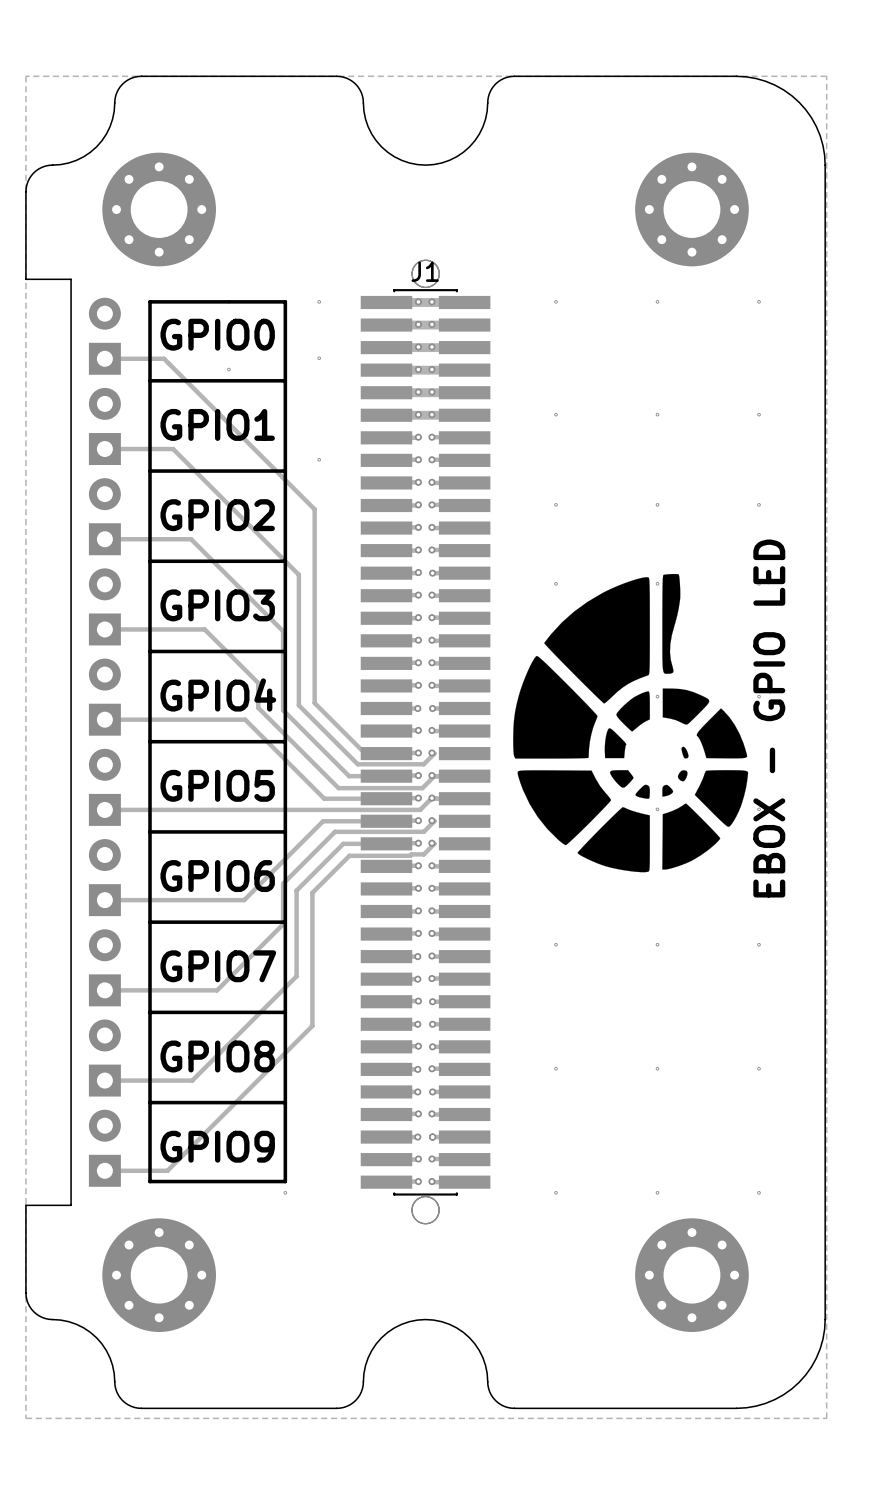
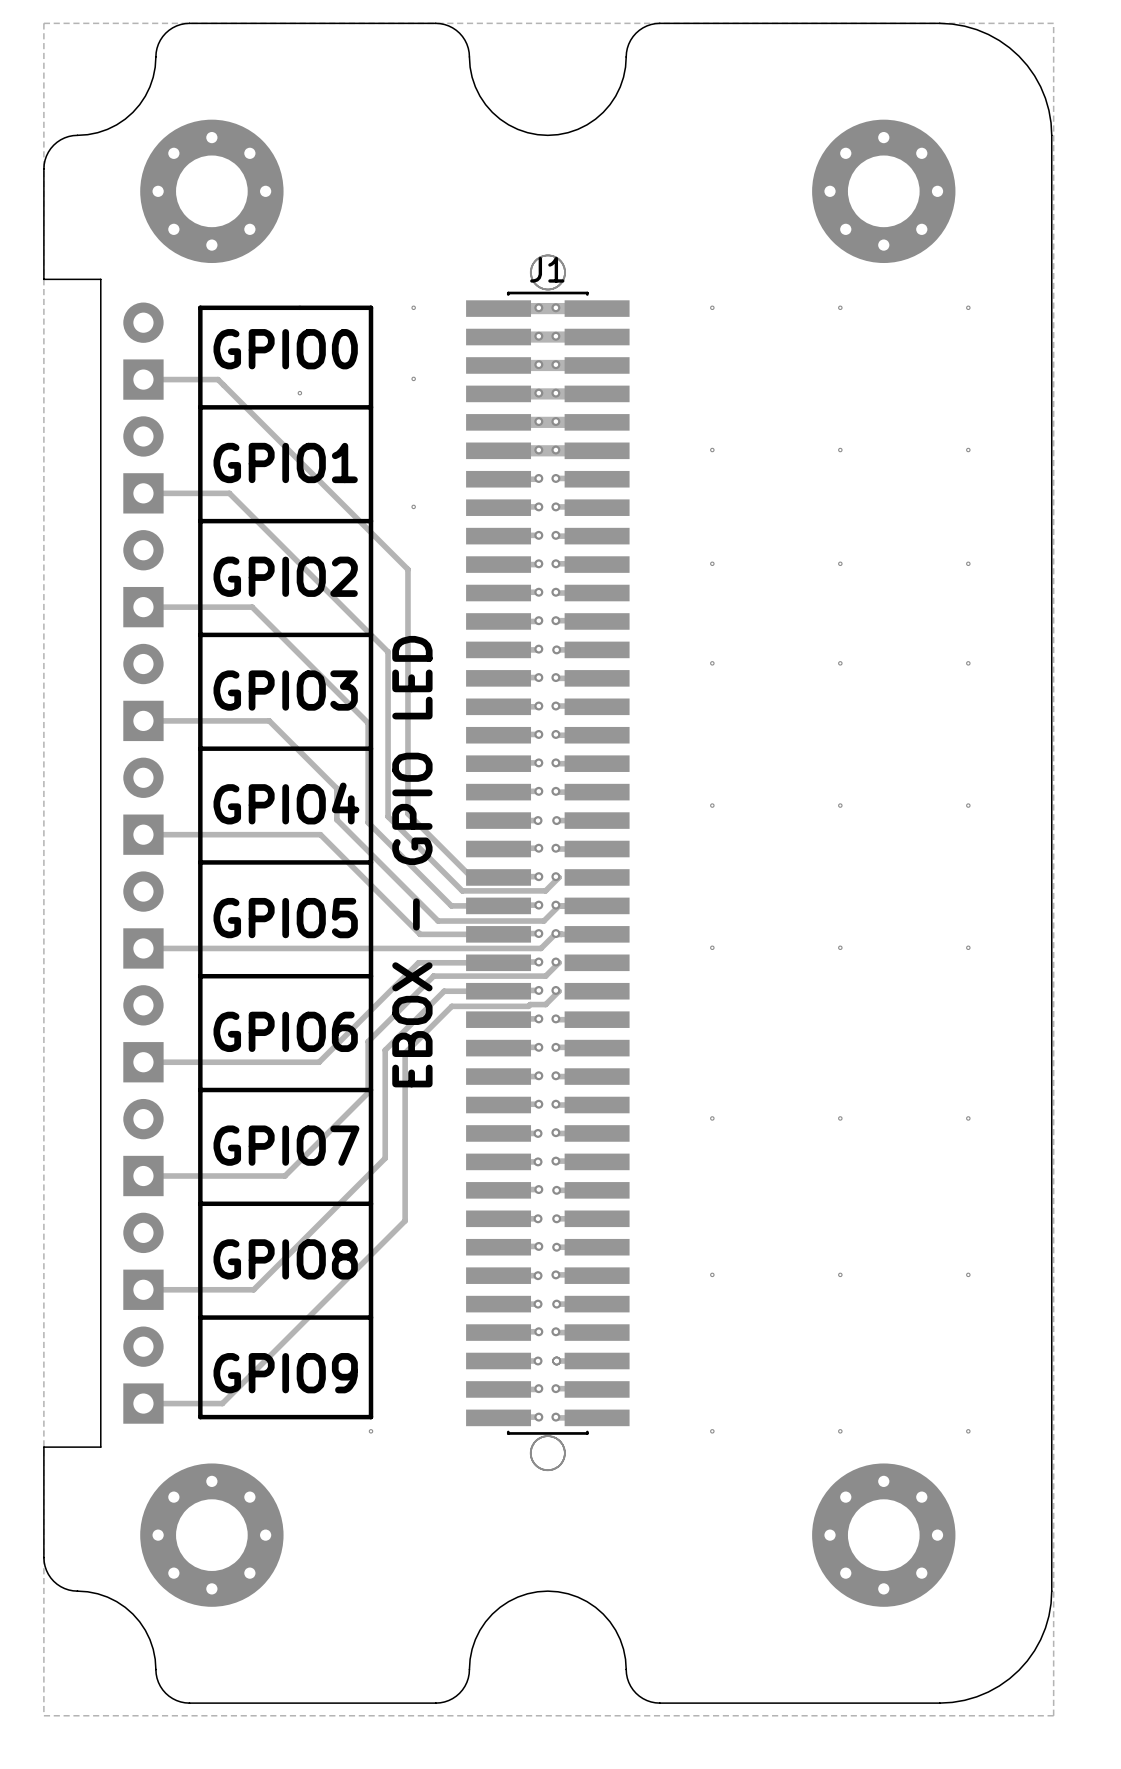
drawing: [513, 573, 749, 873] -> none
text: EBOX - GPIO LED (769, 718) -> none
text: none -> EBOX - GPIO LED (412, 861)

